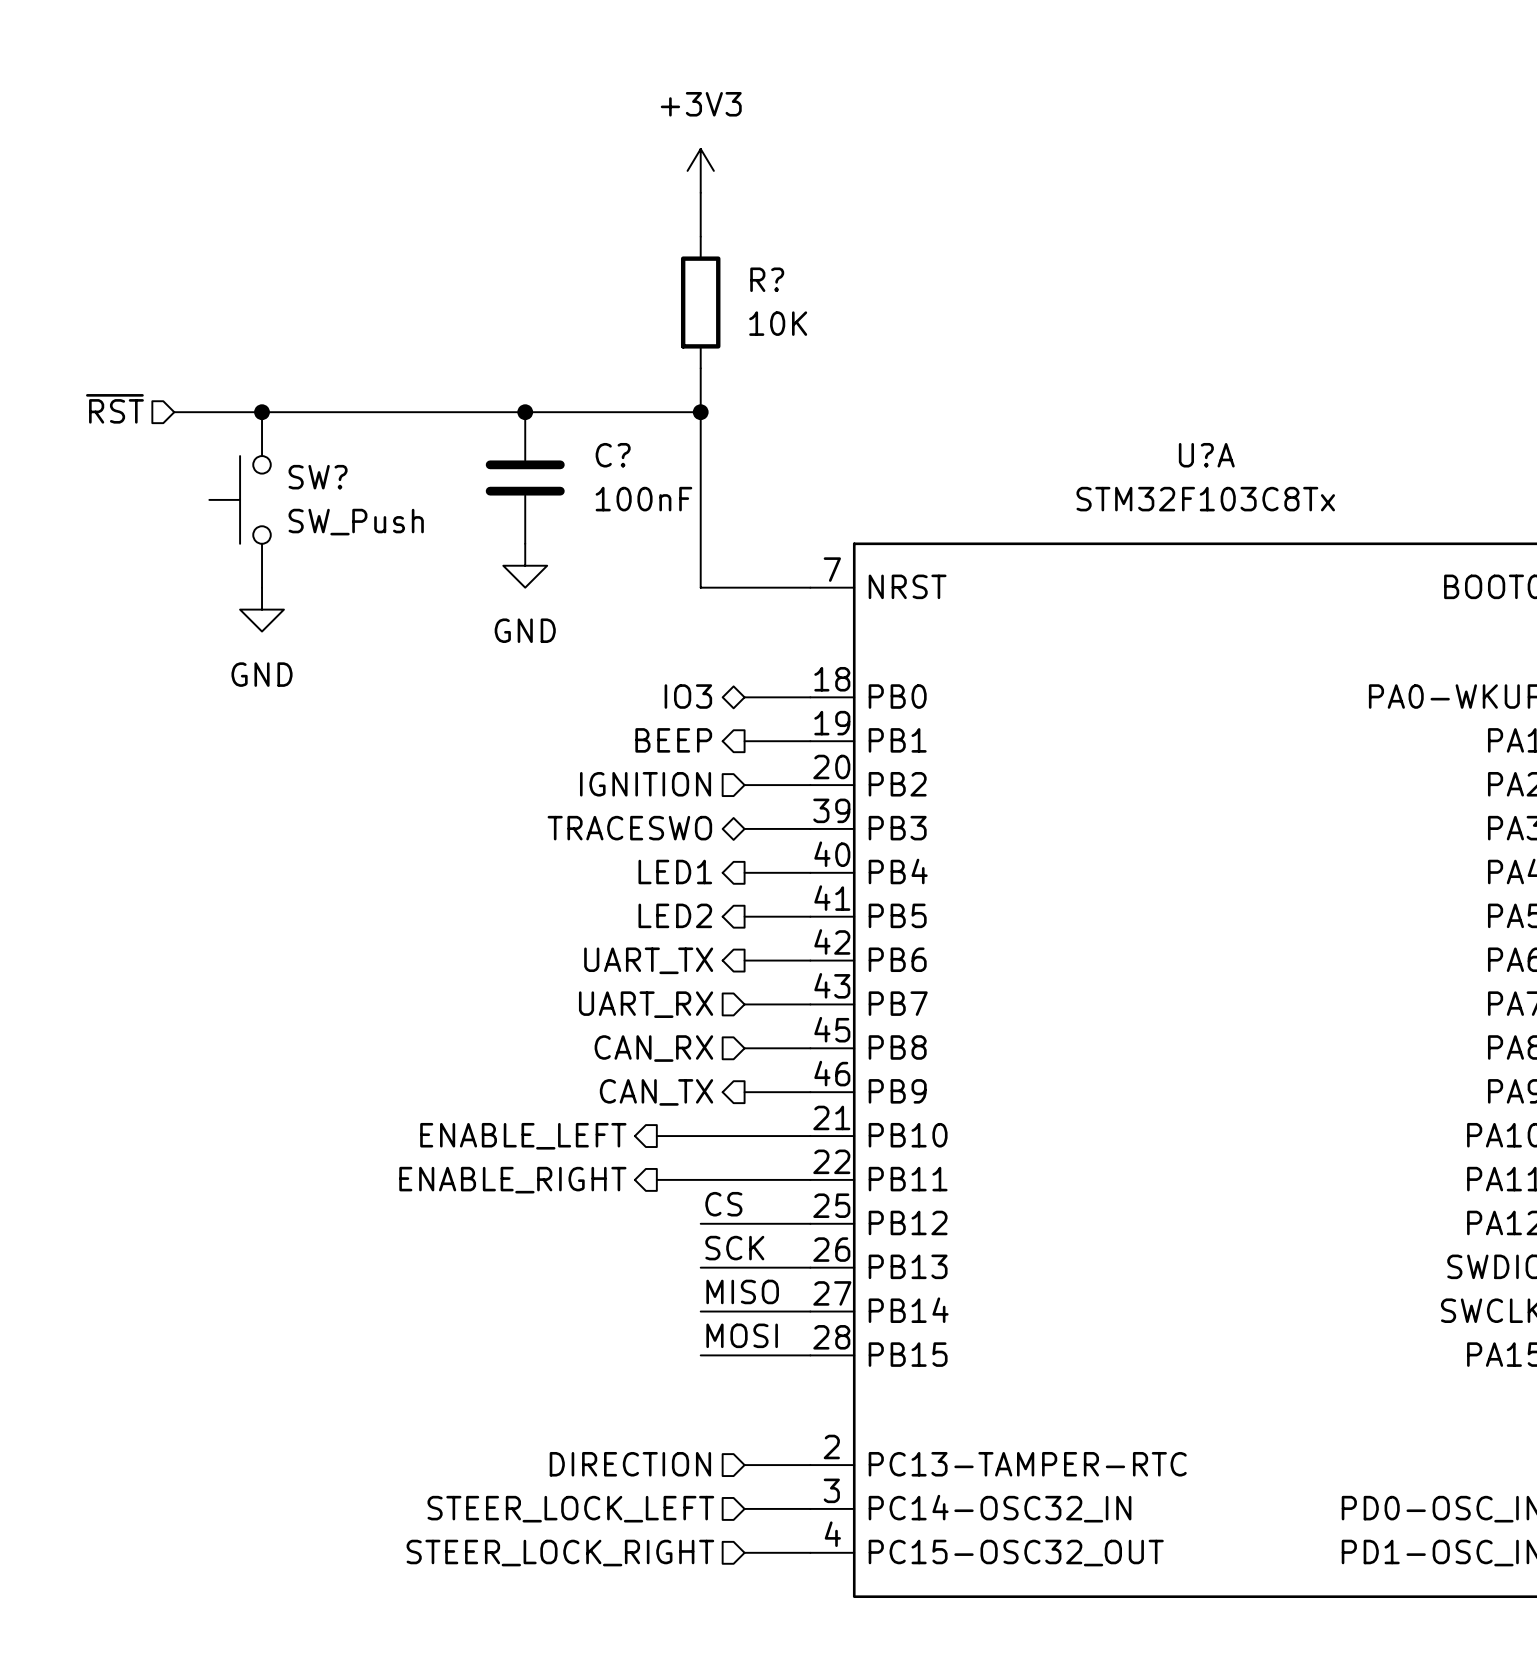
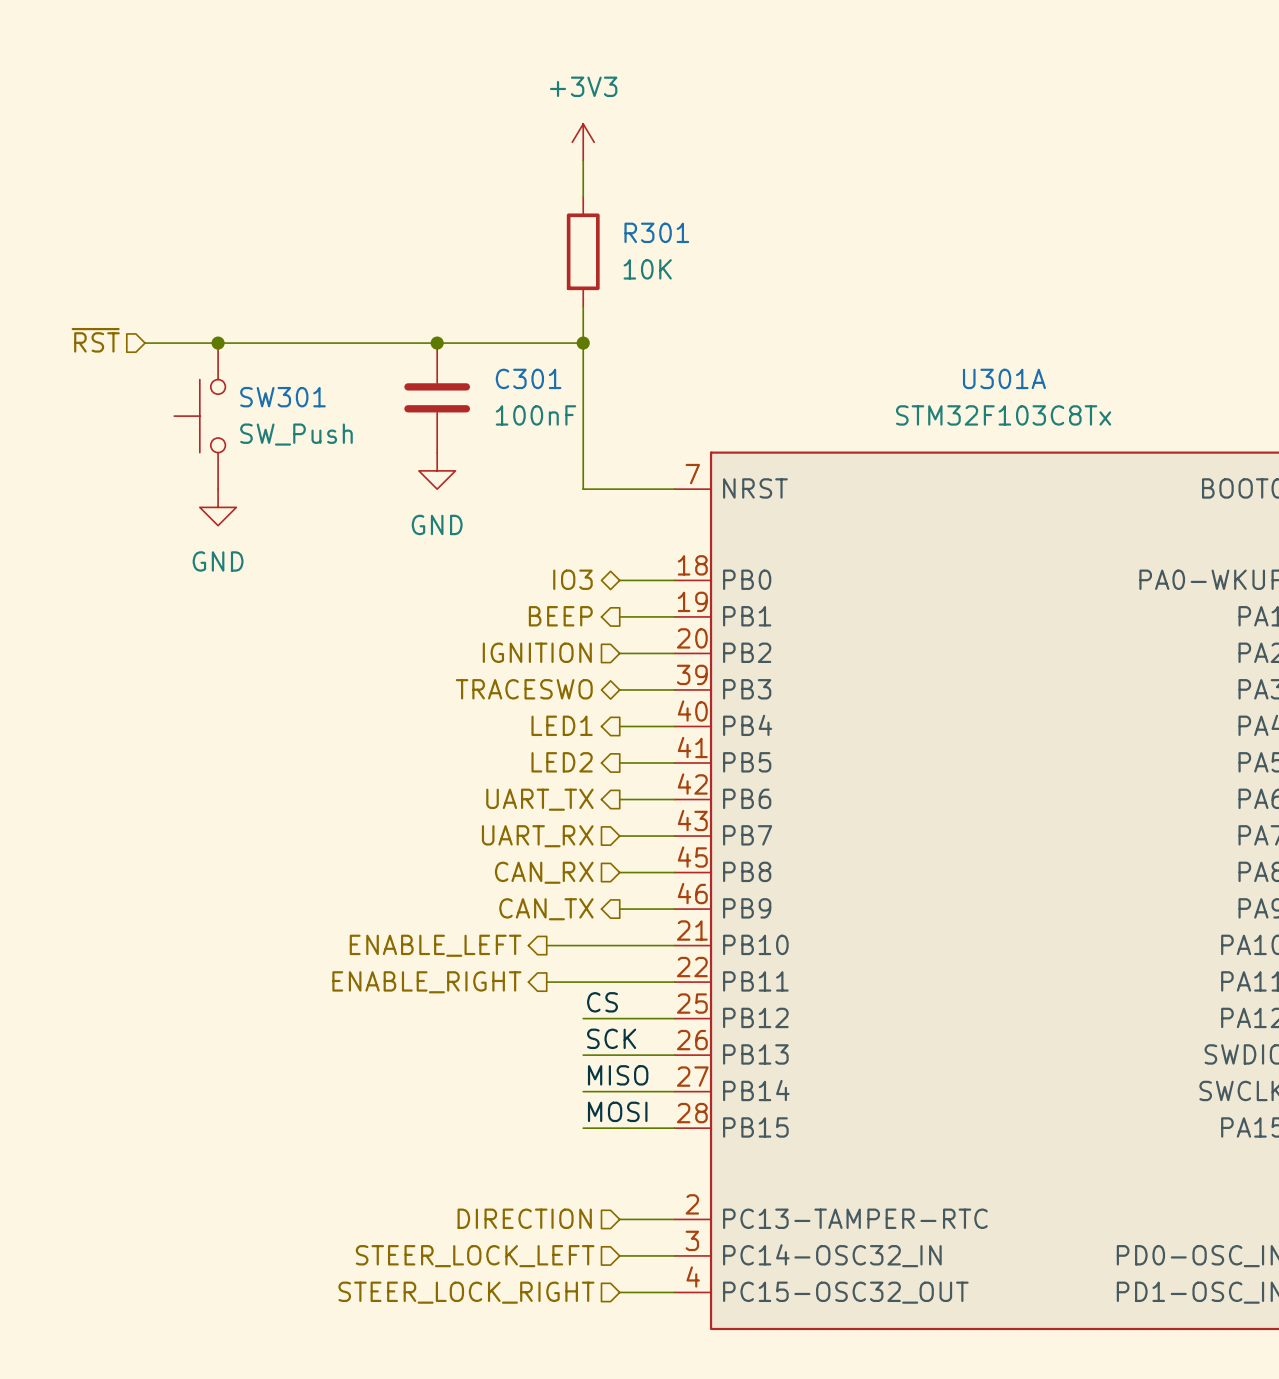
R? name: R? (767, 279) -> R301 (656, 232)
C? name: C? (613, 455) -> C301 (528, 378)
U?A name: U?A (1206, 455) -> U301A (1004, 378)
SW? name: SW? (318, 477) -> SW301 (282, 397)

